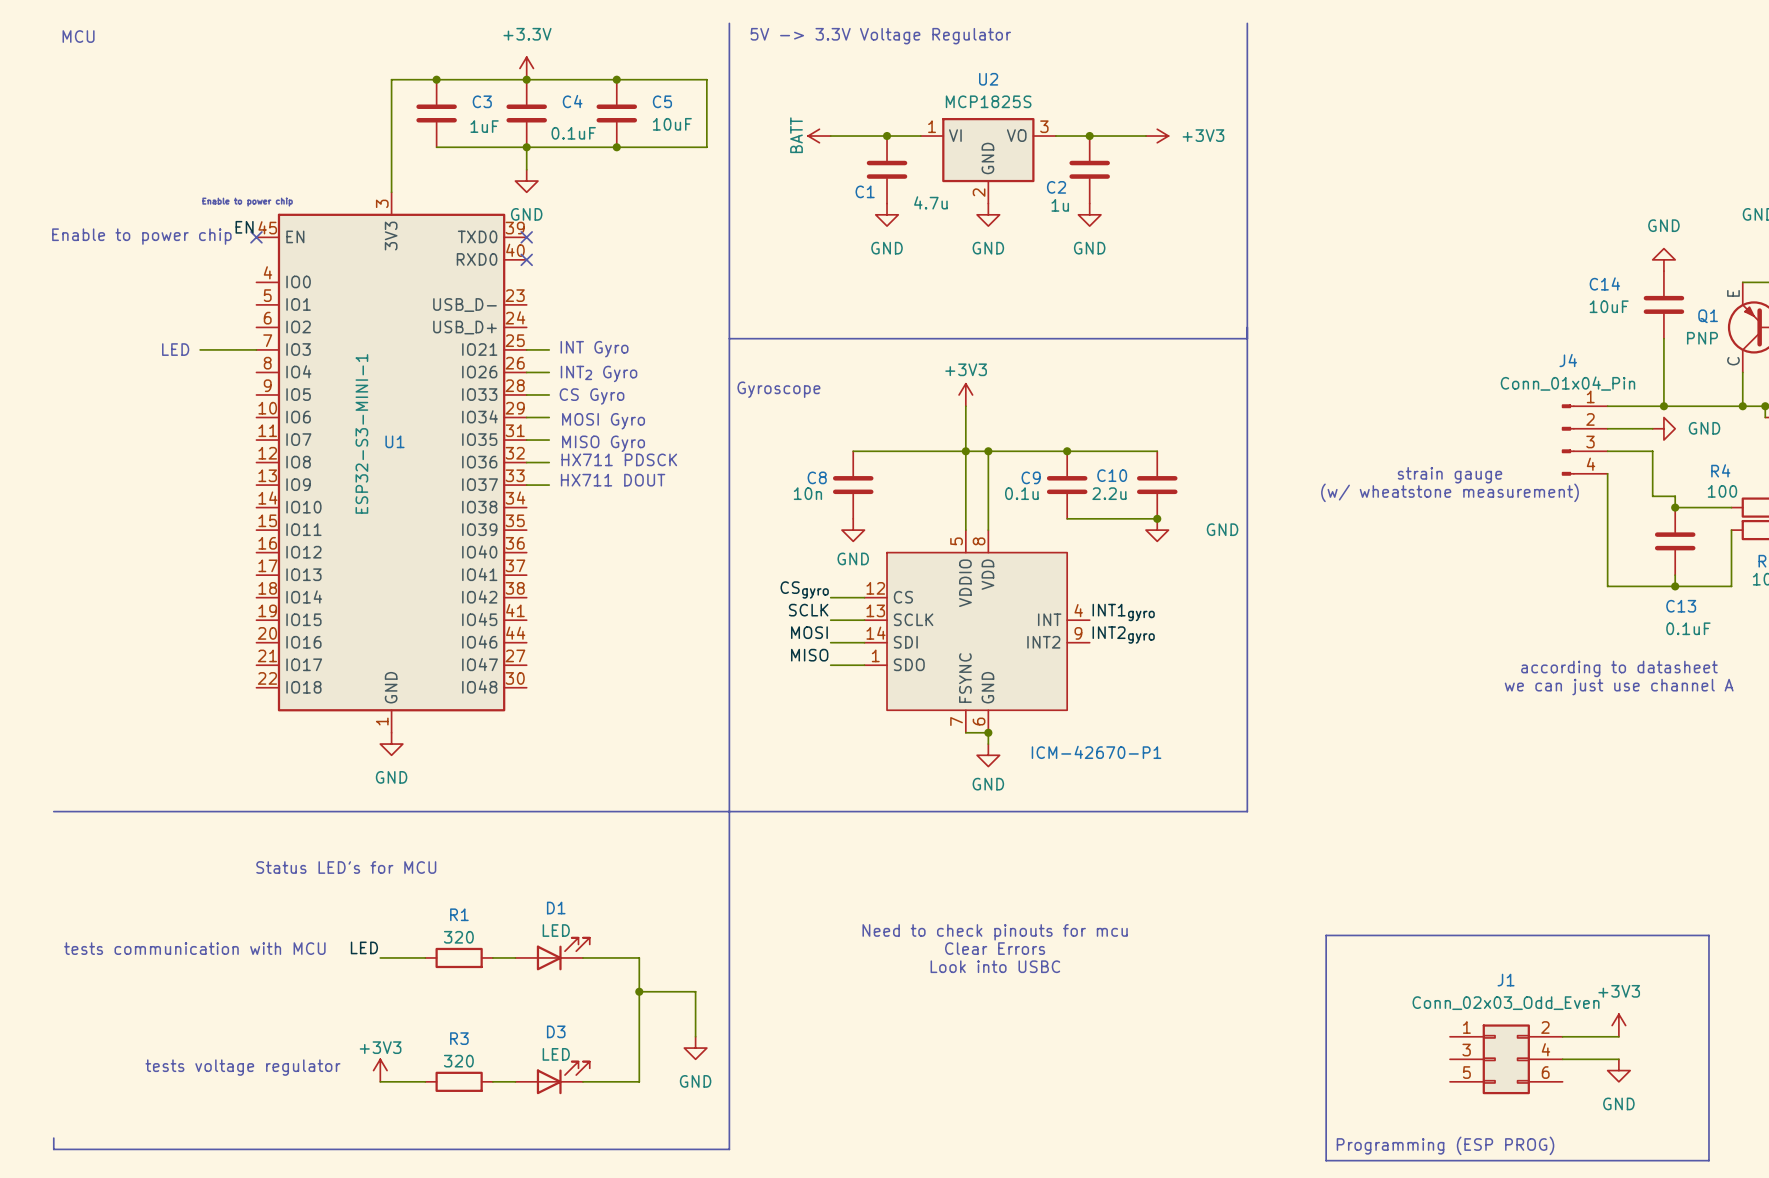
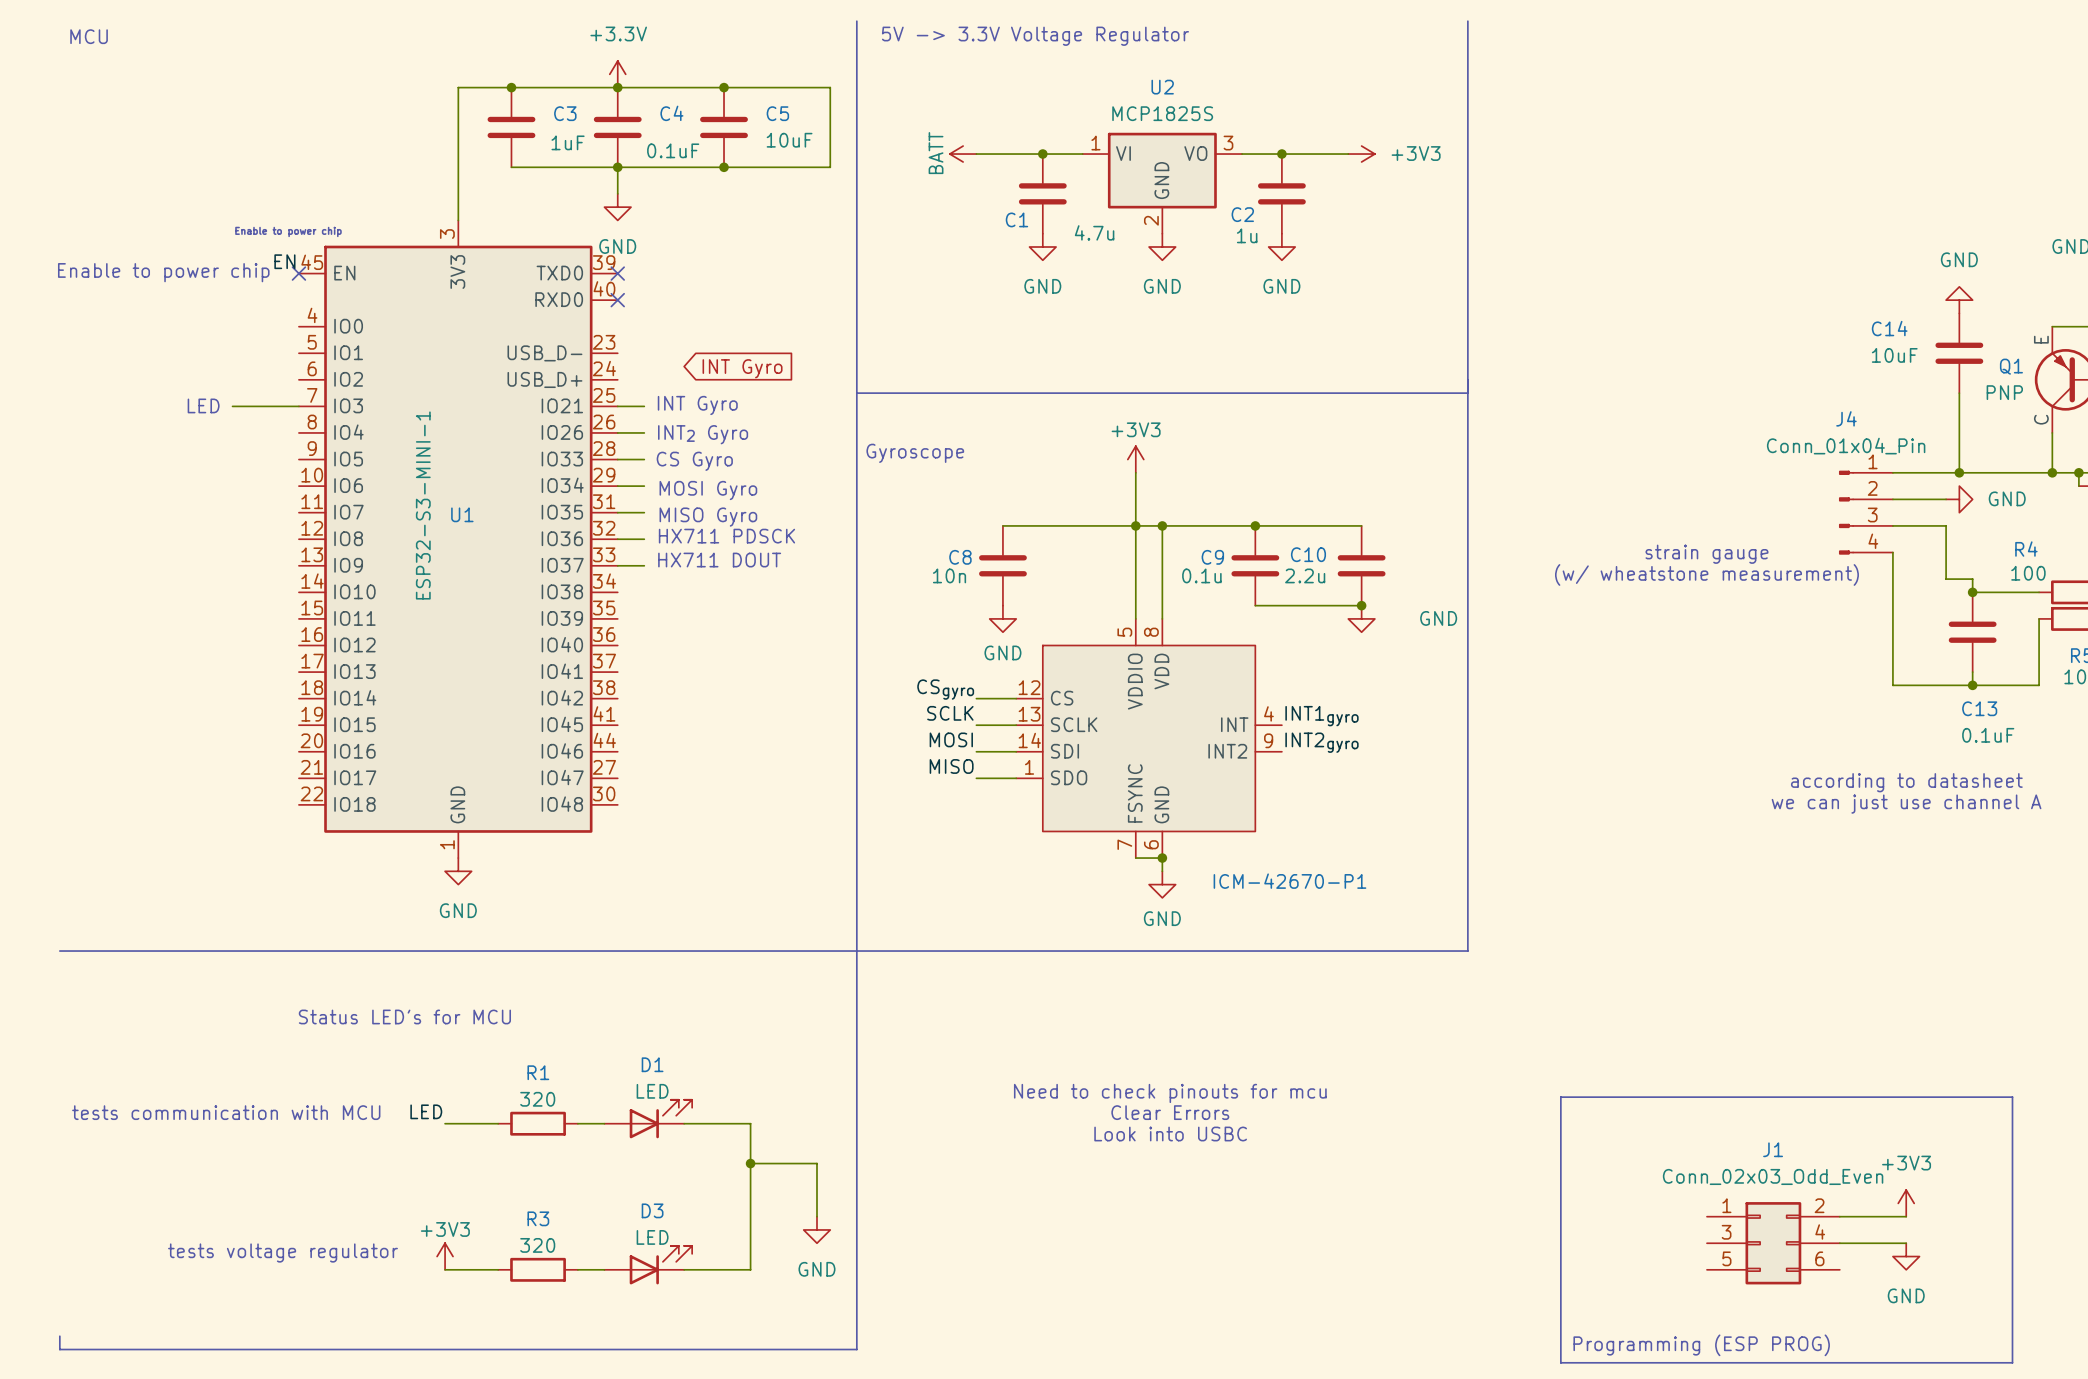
global label: none -> INT Gyro (742, 368)

